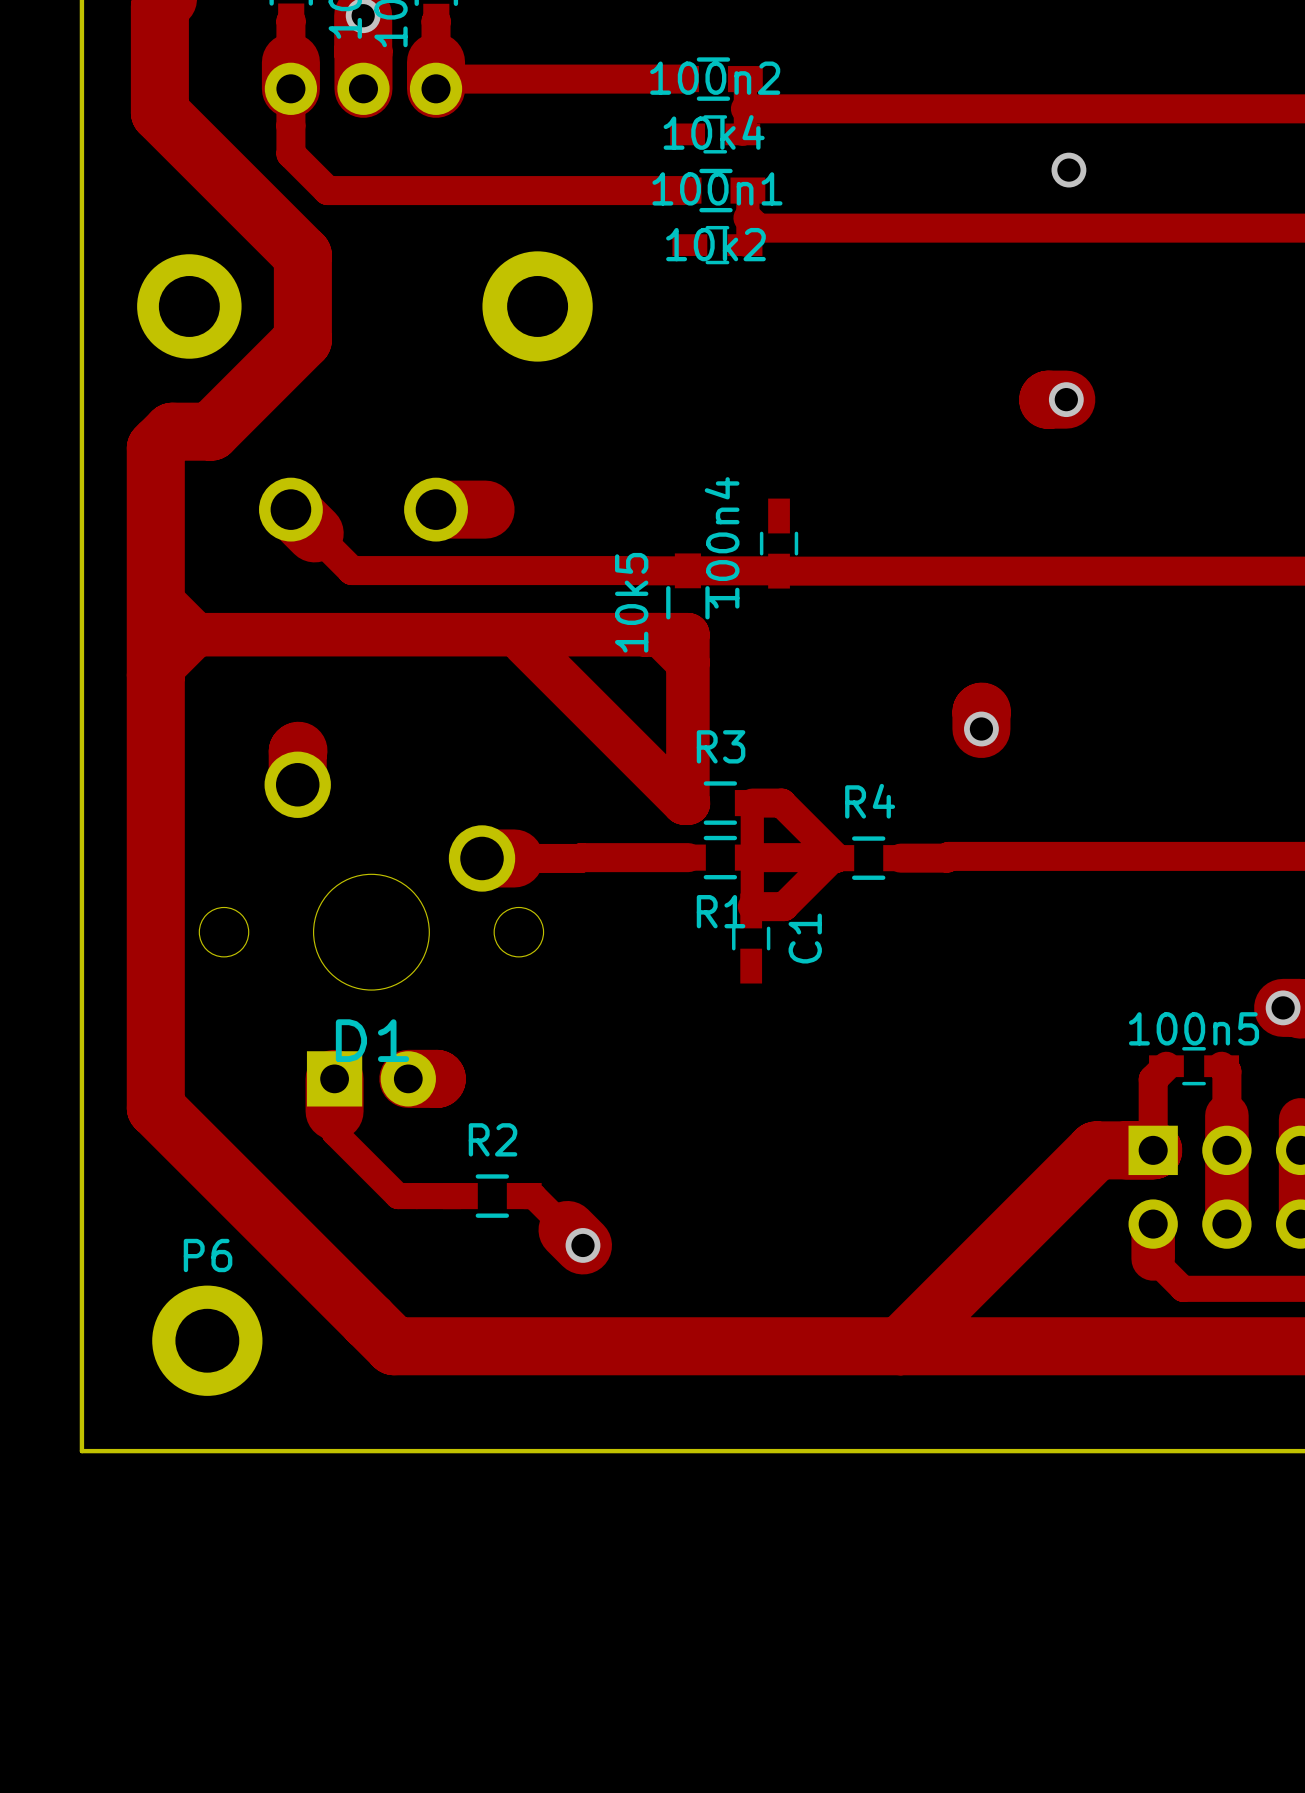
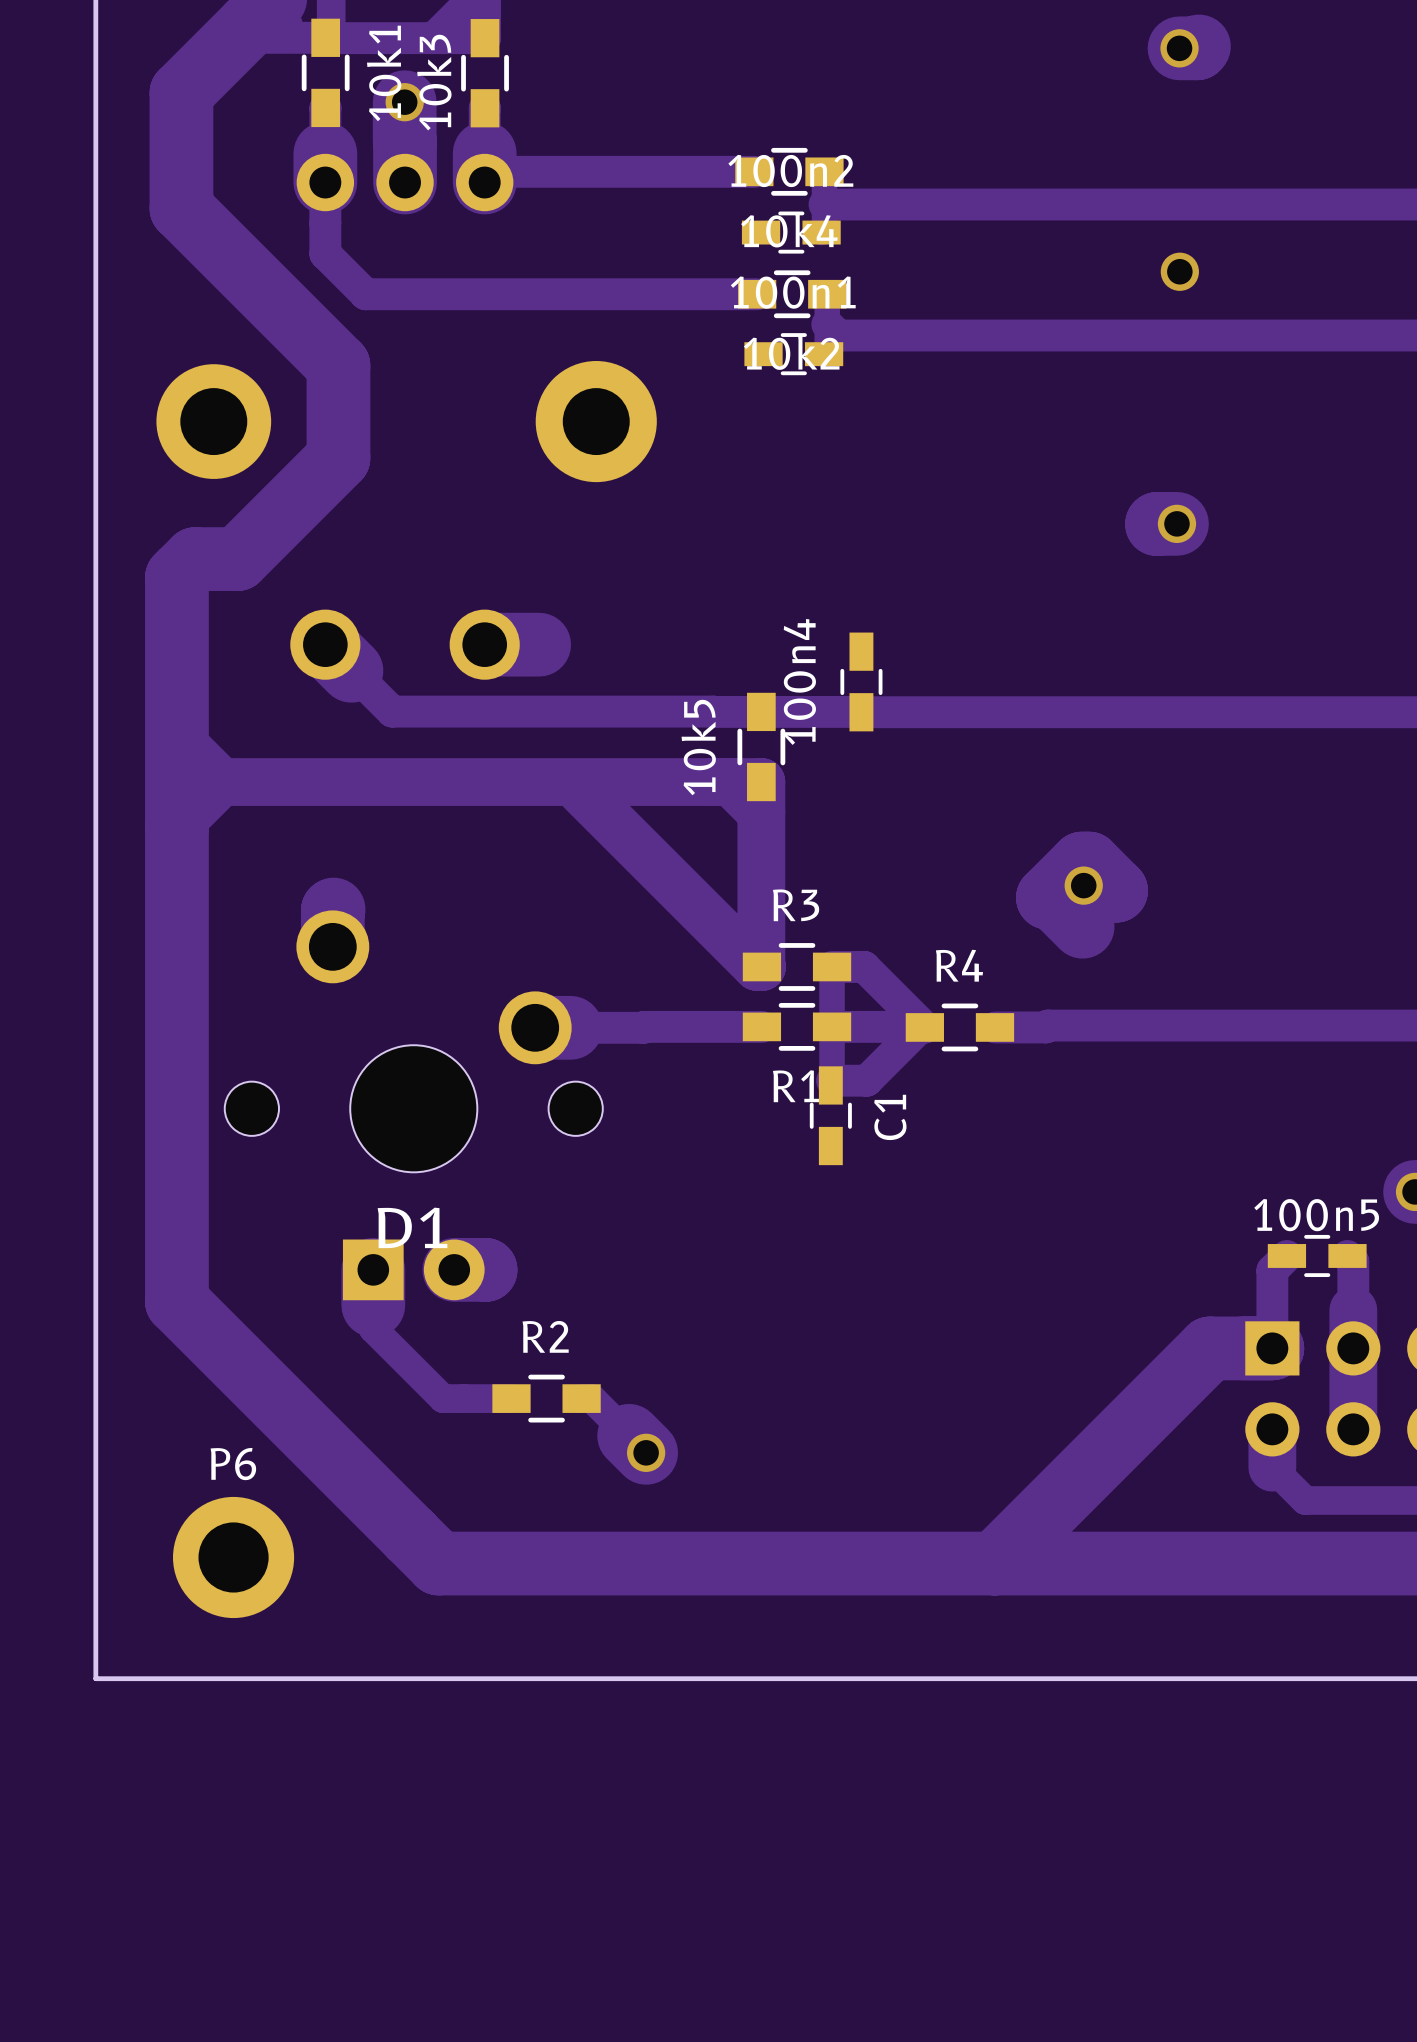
track: (981, 711) (981, 729) -> none
track: none -> (1083, 890) (1116, 890) (1088, 863) (1082, 863) (1047, 897) (1053, 897) (1082, 926)

